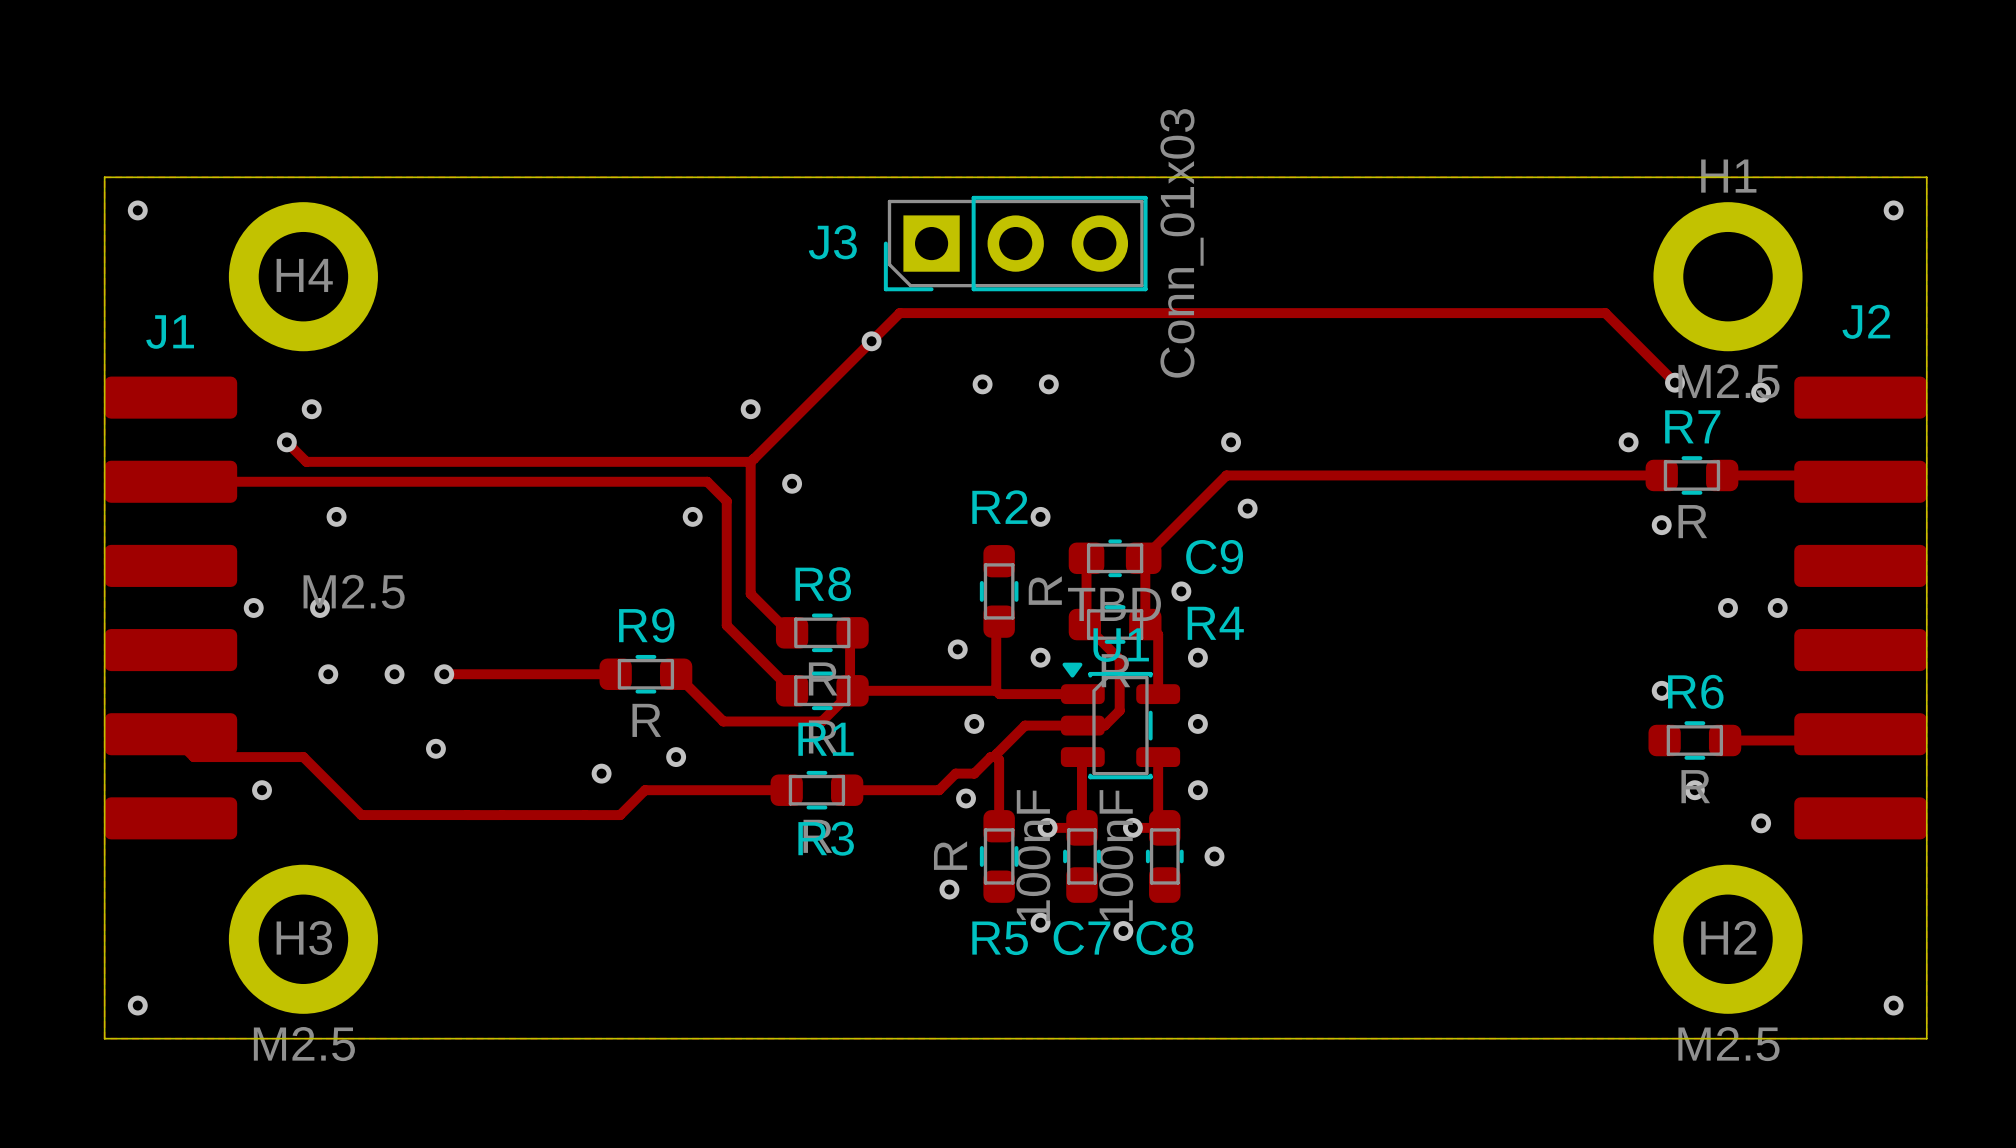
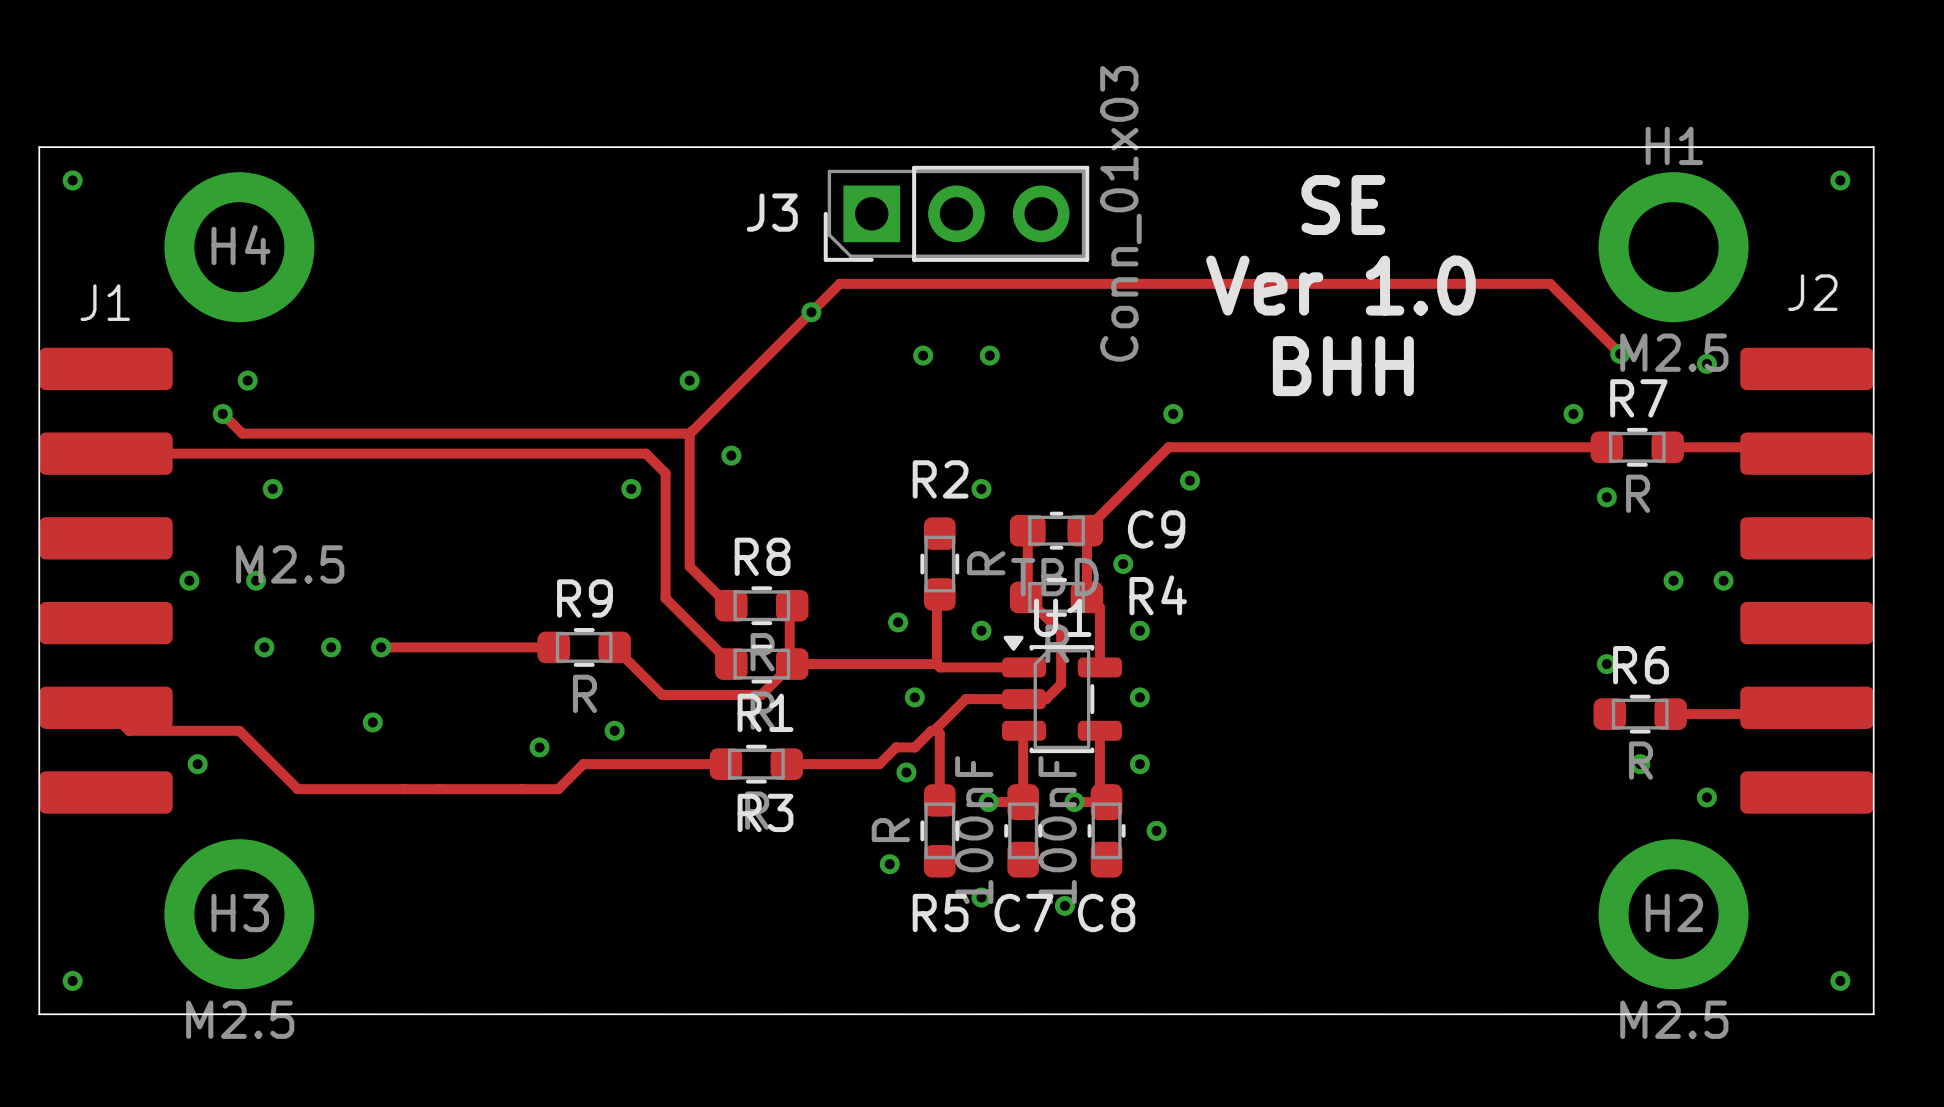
text: none -> SE (1343, 205)
text: none -> Ver 1.0 (1340, 285)
text: none -> BHH (1343, 366)

